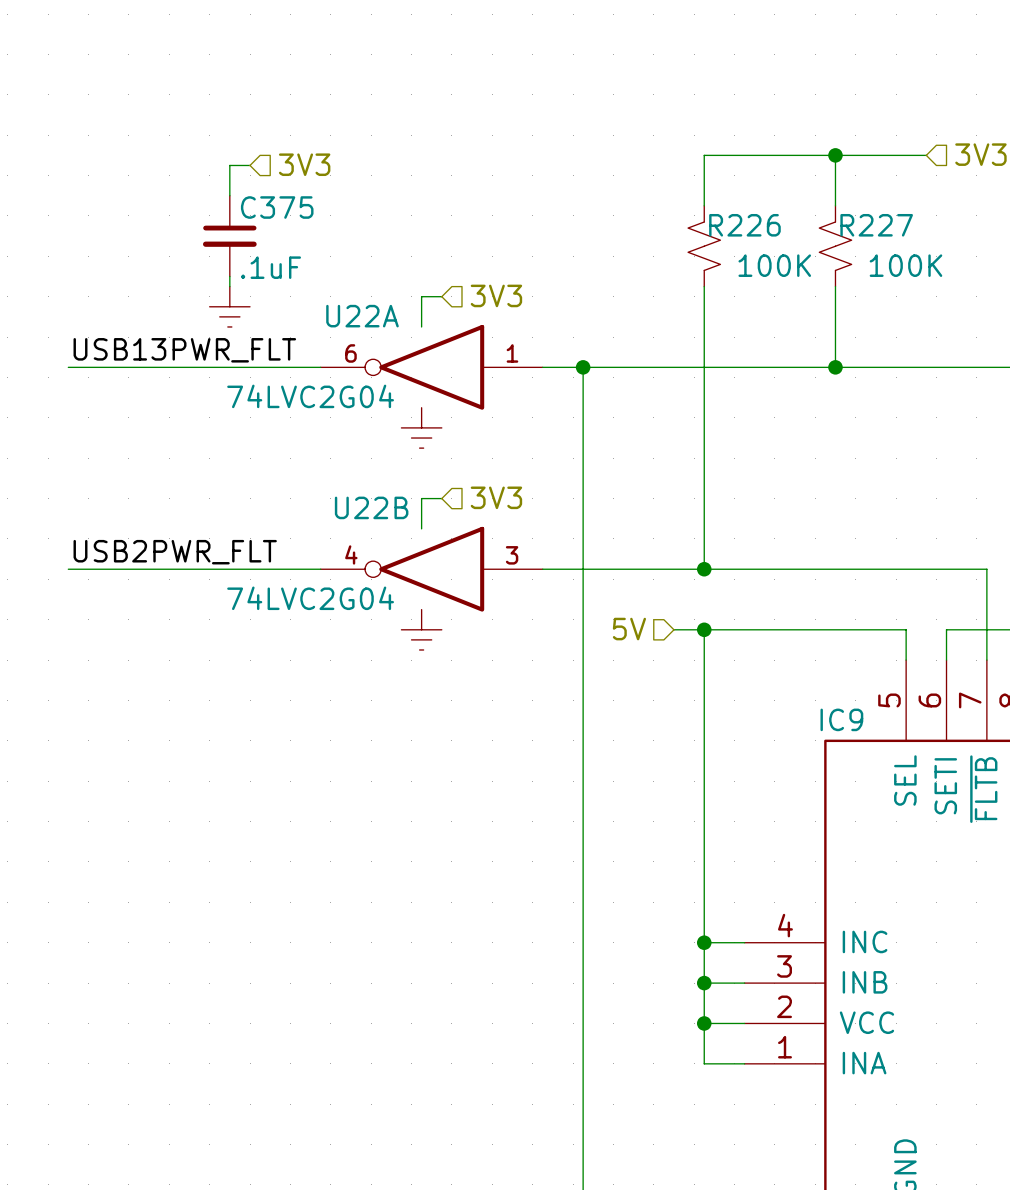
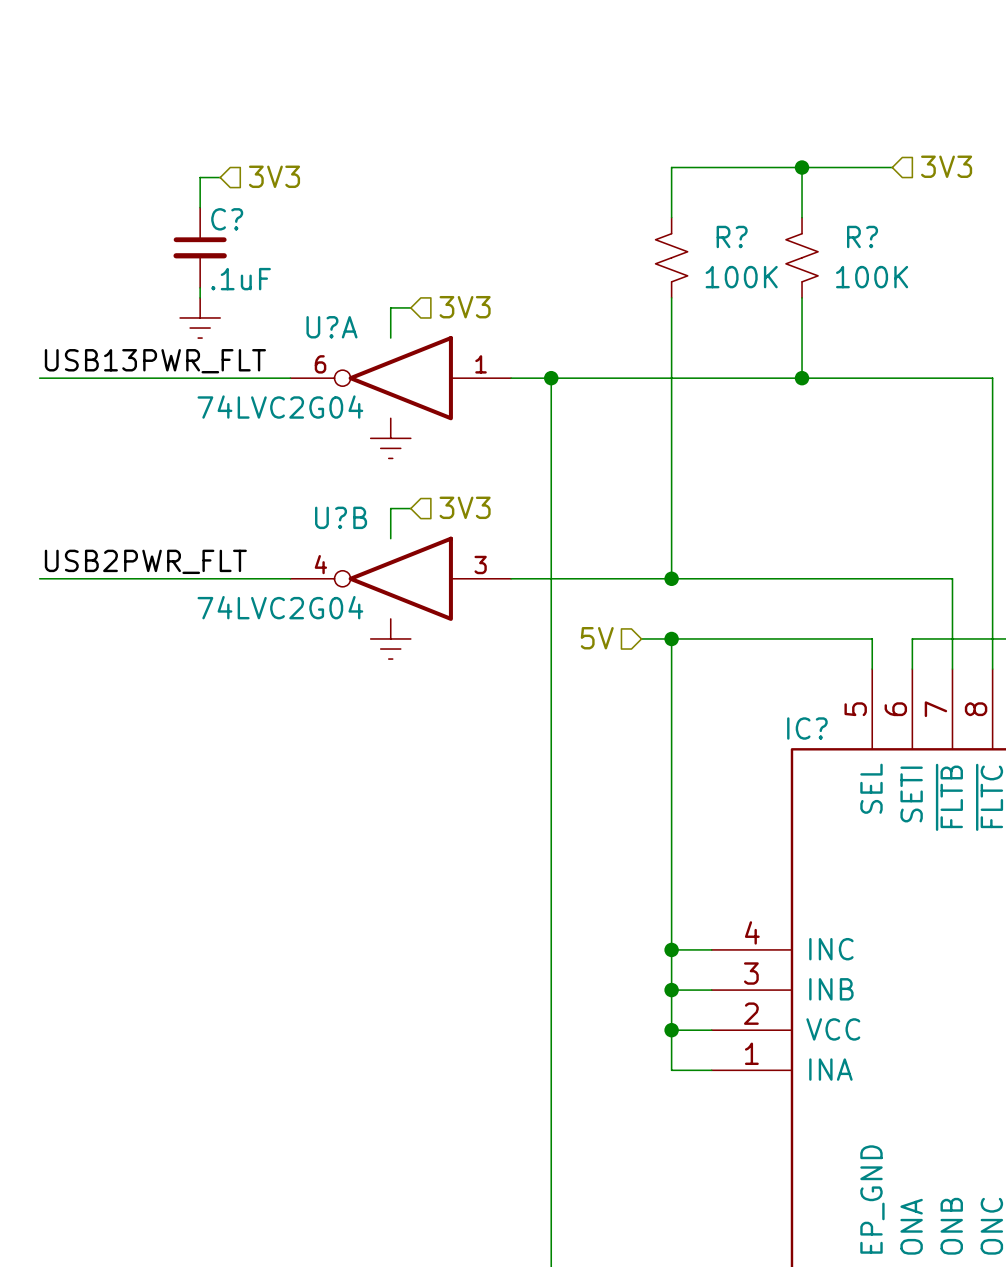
C375 name: C375 (277, 207) -> C? (227, 219)
R226 name: R226 (744, 225) -> R? (732, 236)
R227 name: R227 (876, 225) -> R? (862, 236)
U22A name: U22A (362, 316) -> U?A (331, 327)
U22B name: U22B (371, 507) -> U?B (341, 517)
IC9 name: IC9 (841, 719) -> IC? (807, 728)

